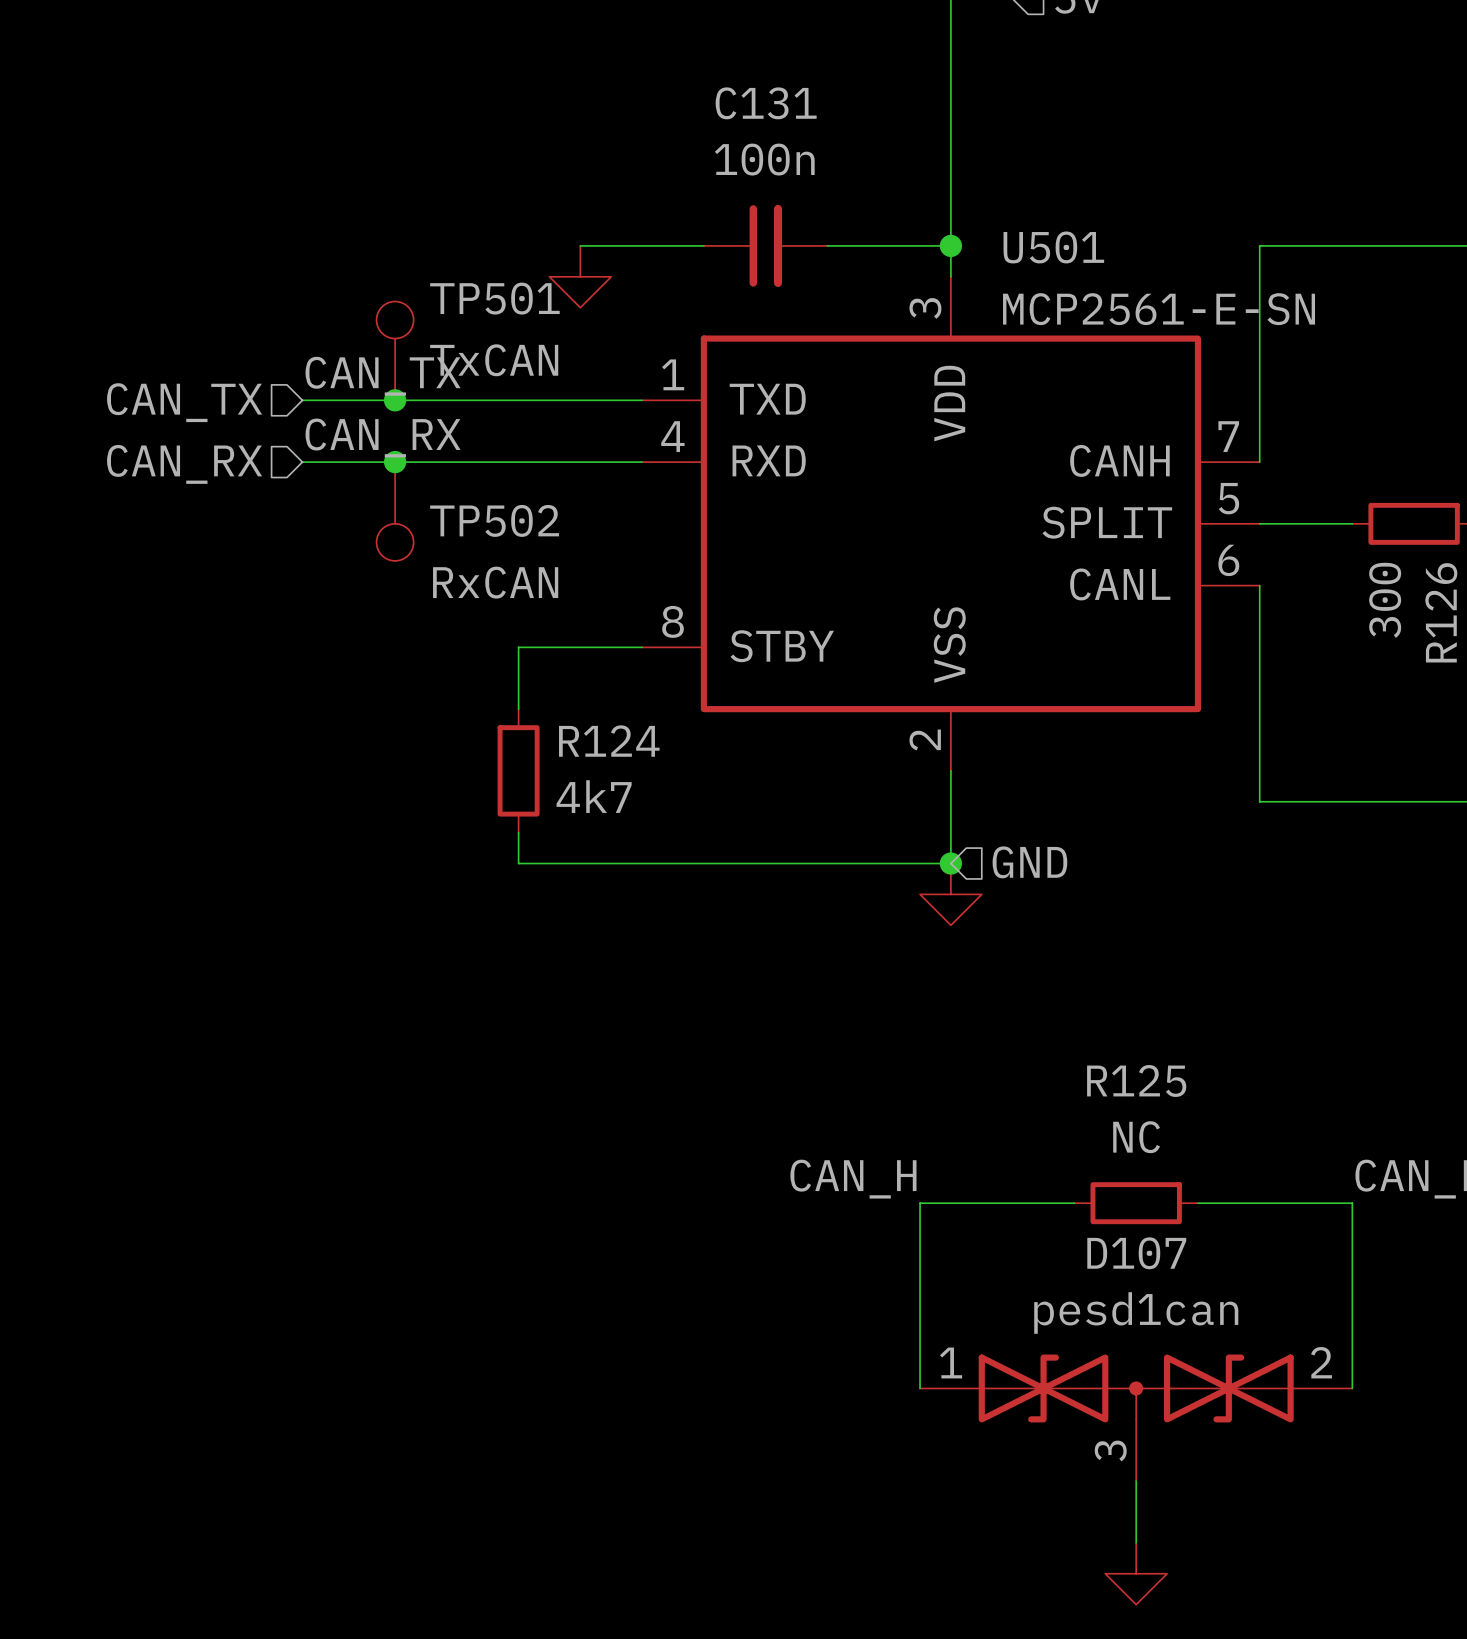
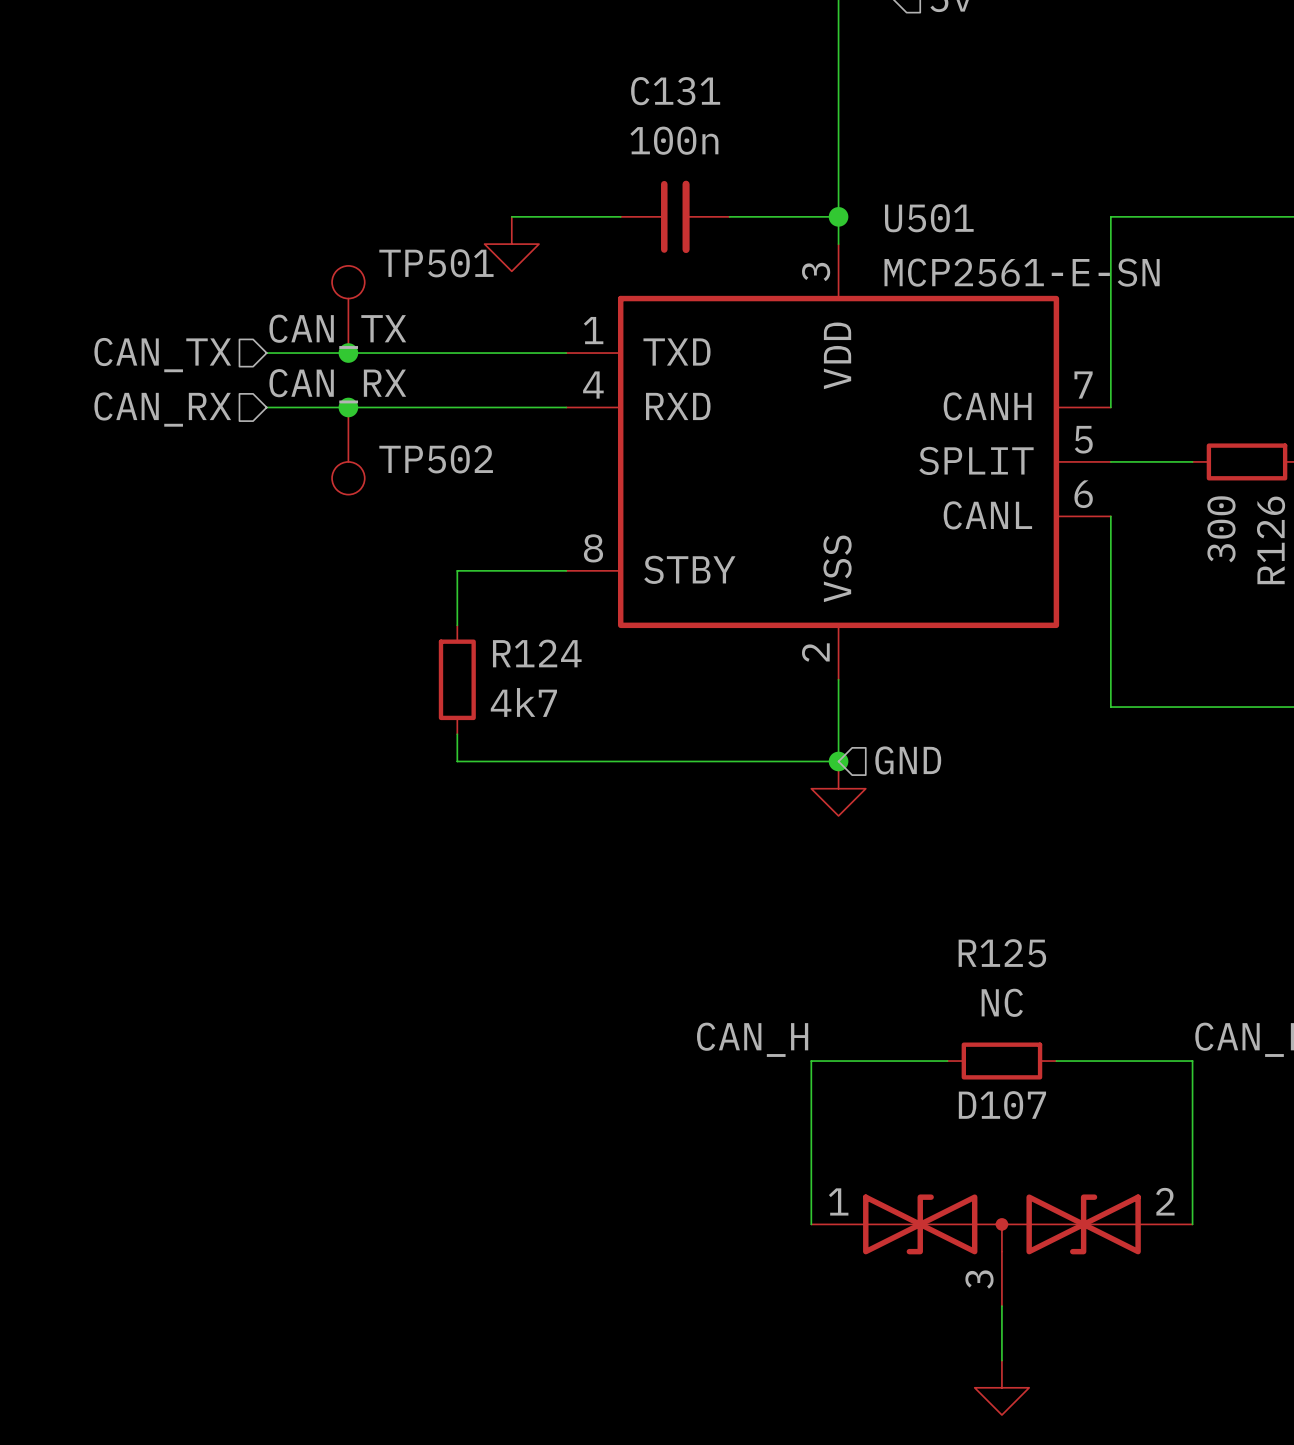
TP501 value: TxCAN (494, 360) -> none
TP502 value: RxCAN (495, 582) -> none
D107 value: pesd1can (1136, 1312) -> none

